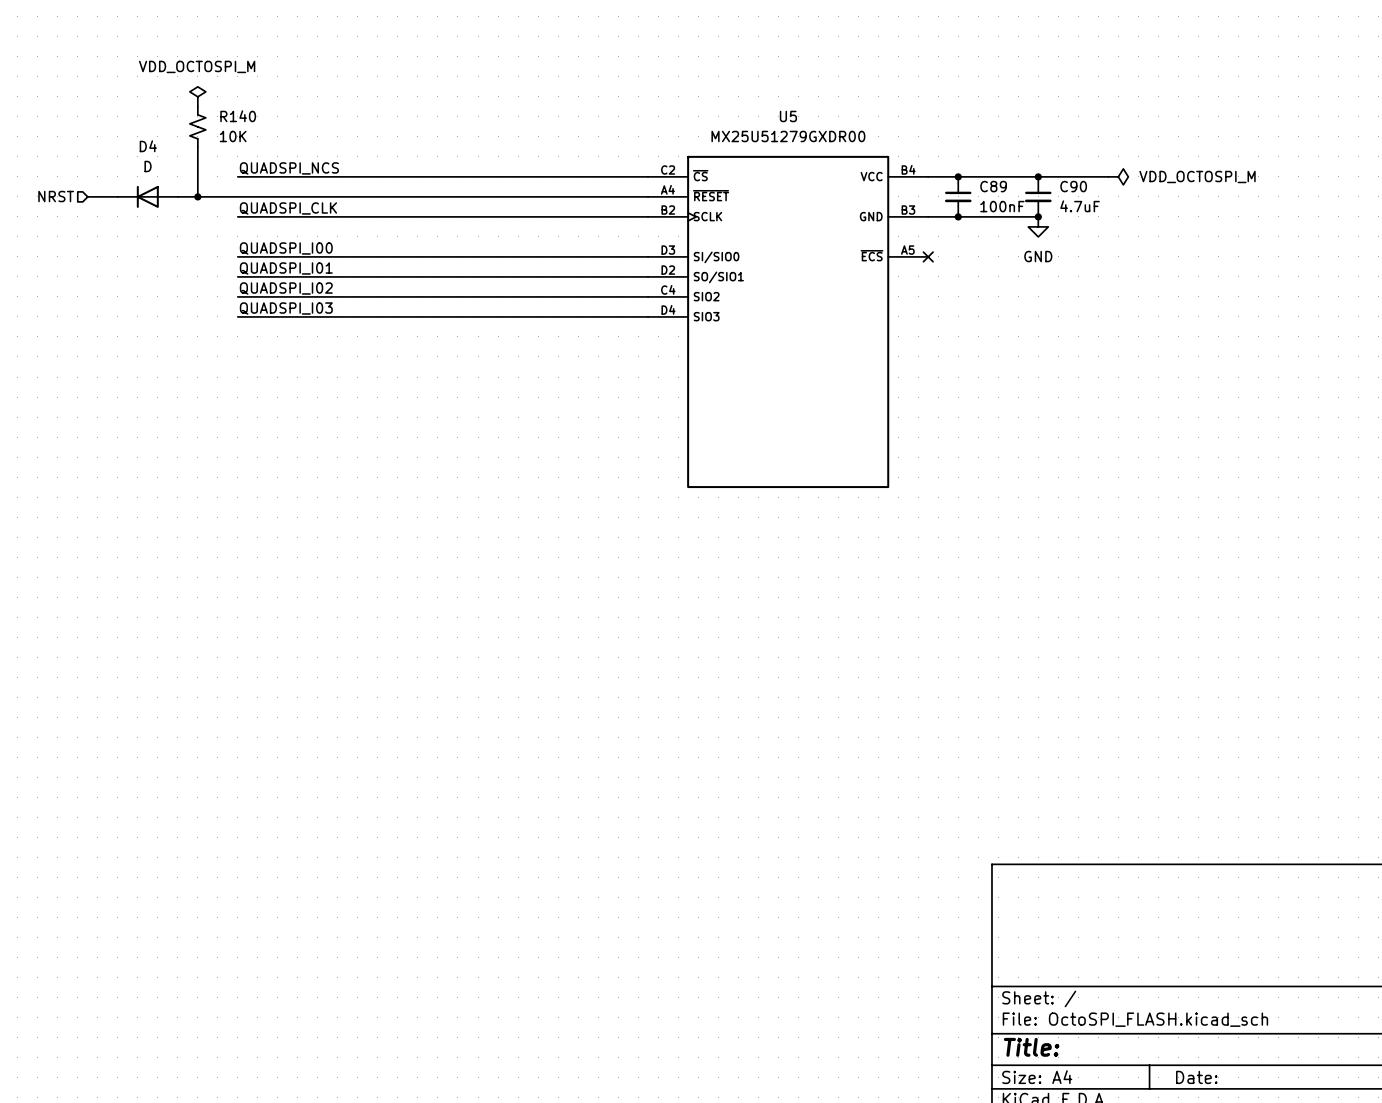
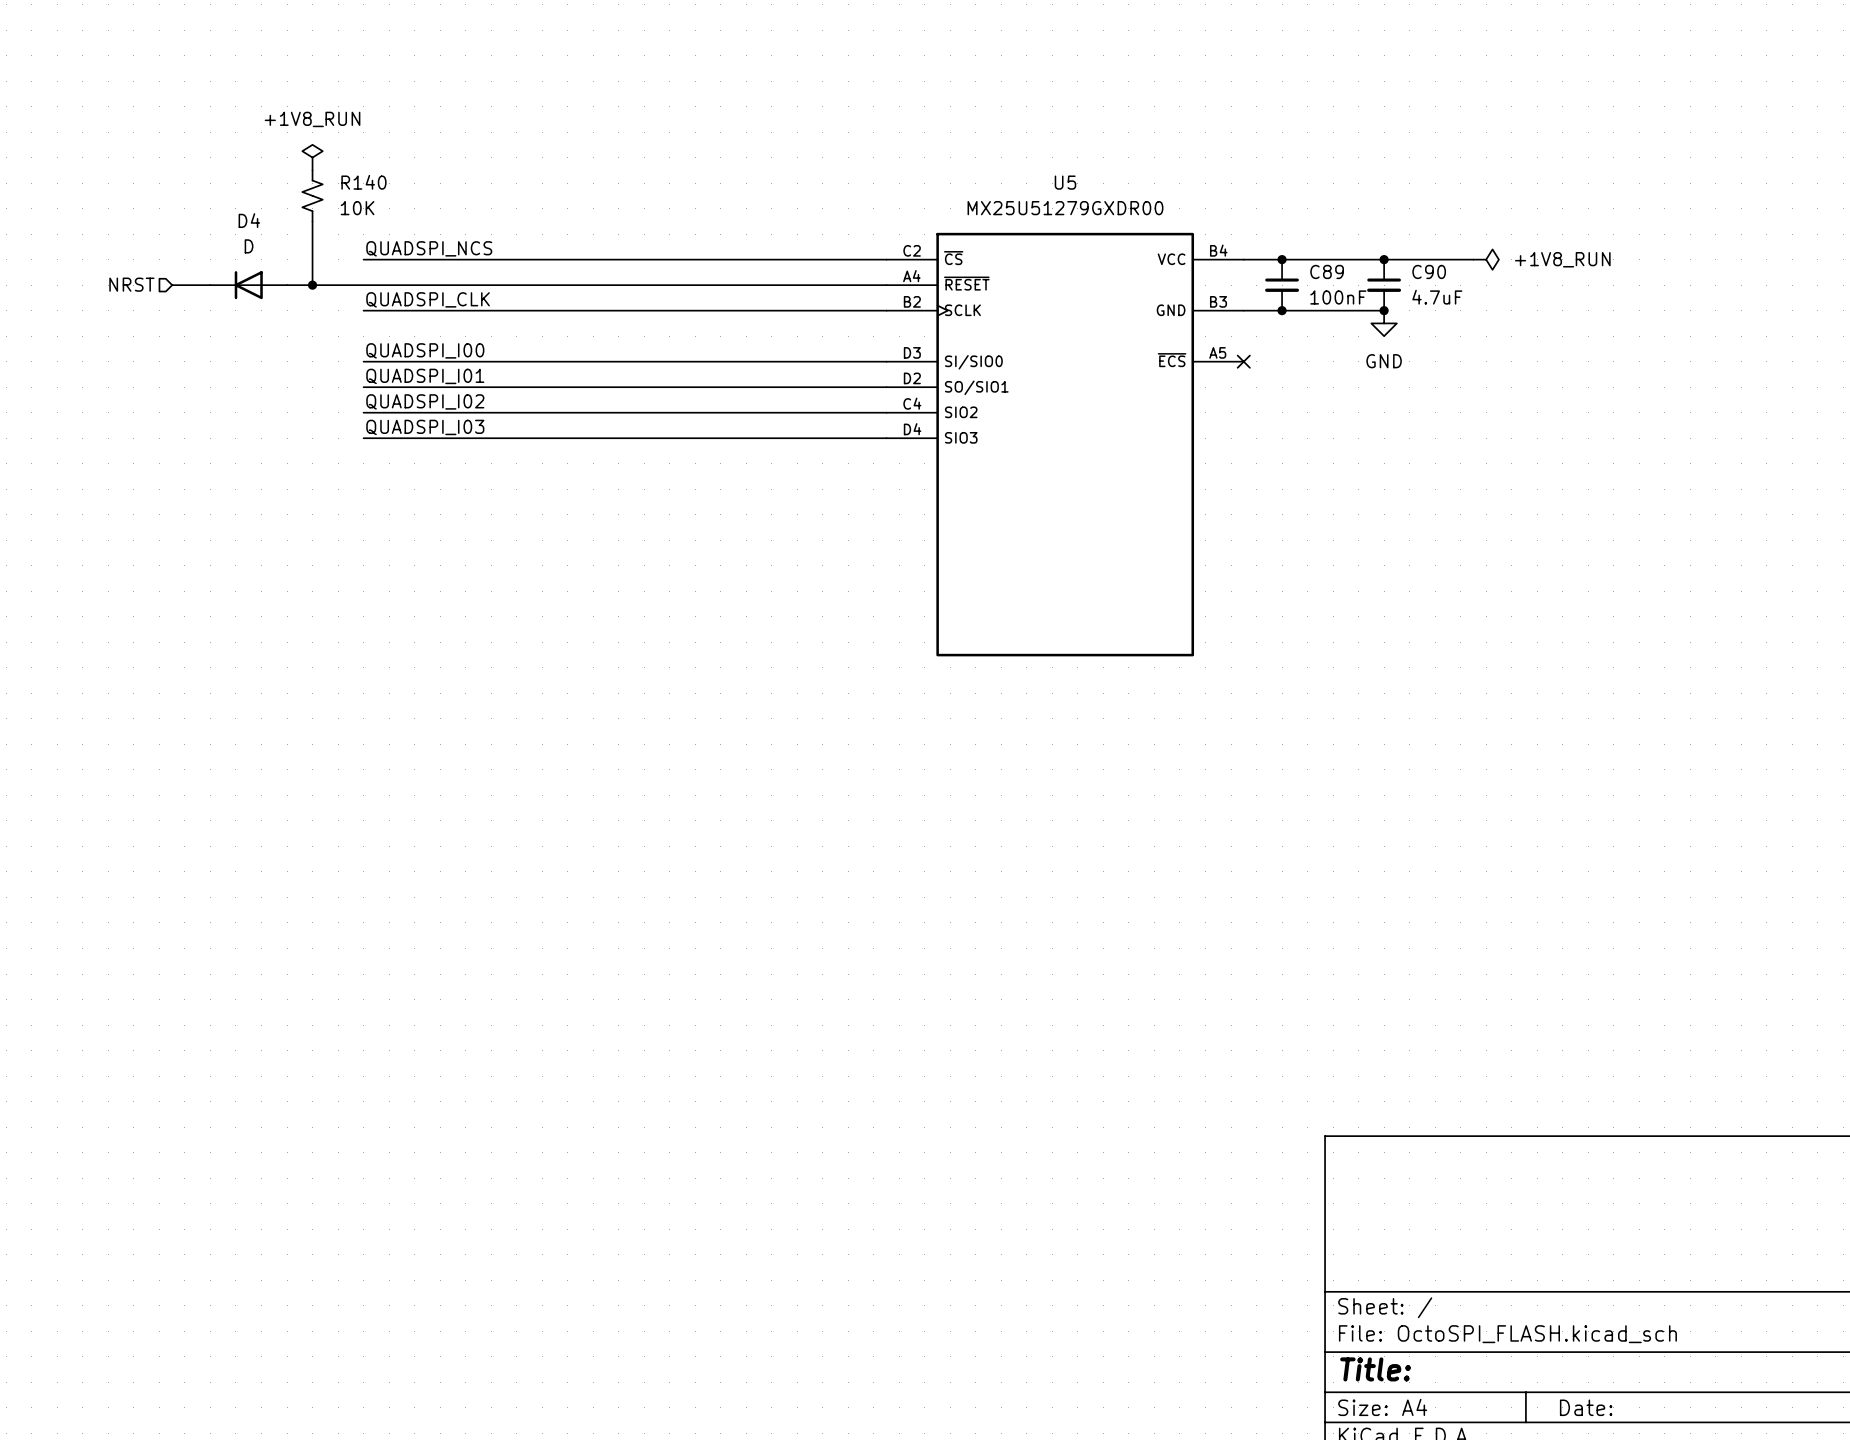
power symbol: VDD_OCTOSPI_M (197, 96) -> +1V8_RUN (312, 157)
power symbol: VDD_OCTOSPI_M (1118, 176) -> +1V8_RUN (1486, 259)

